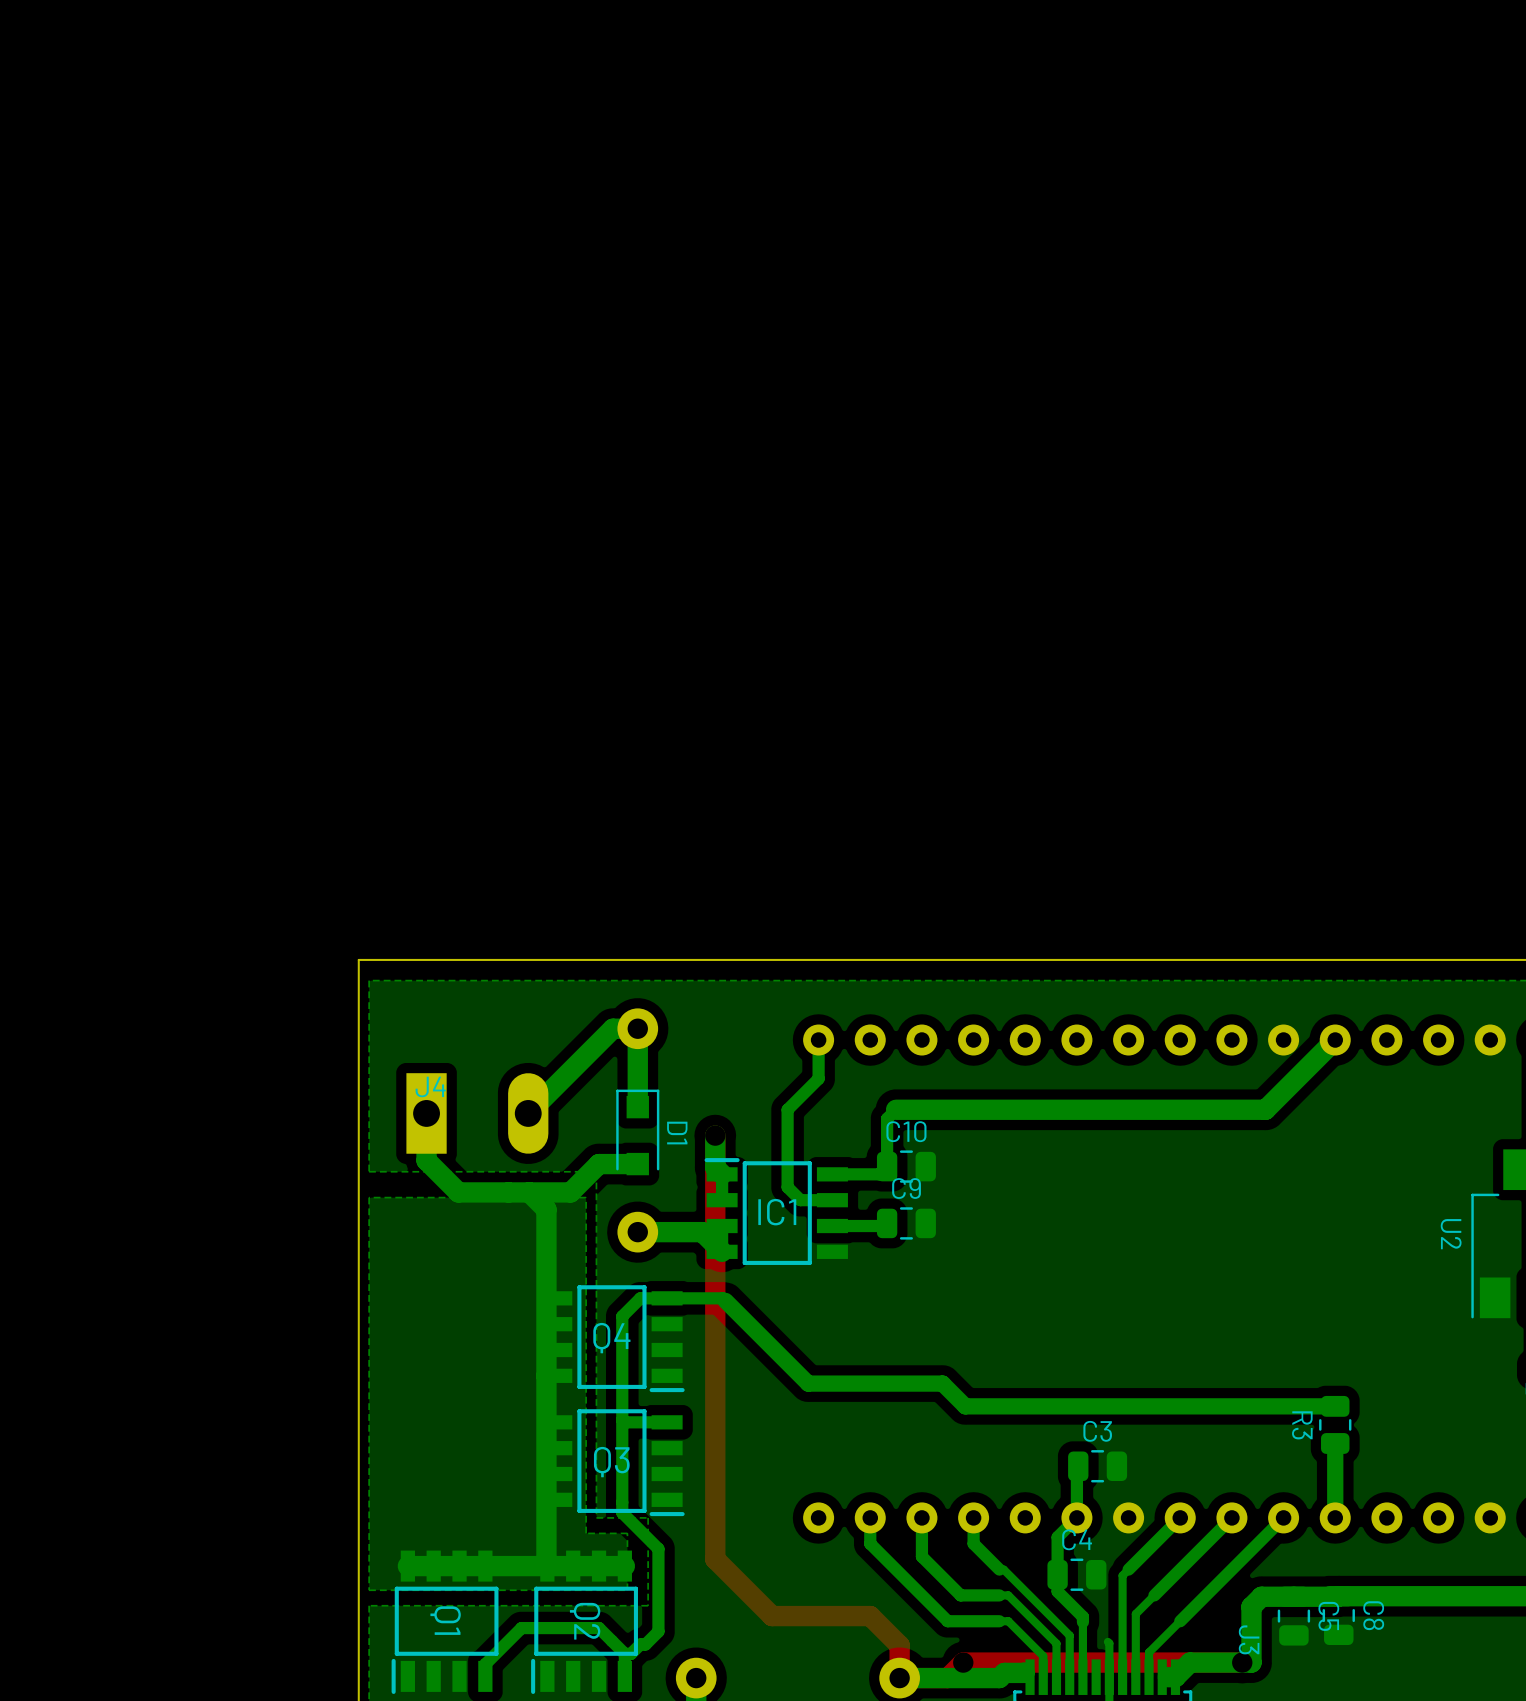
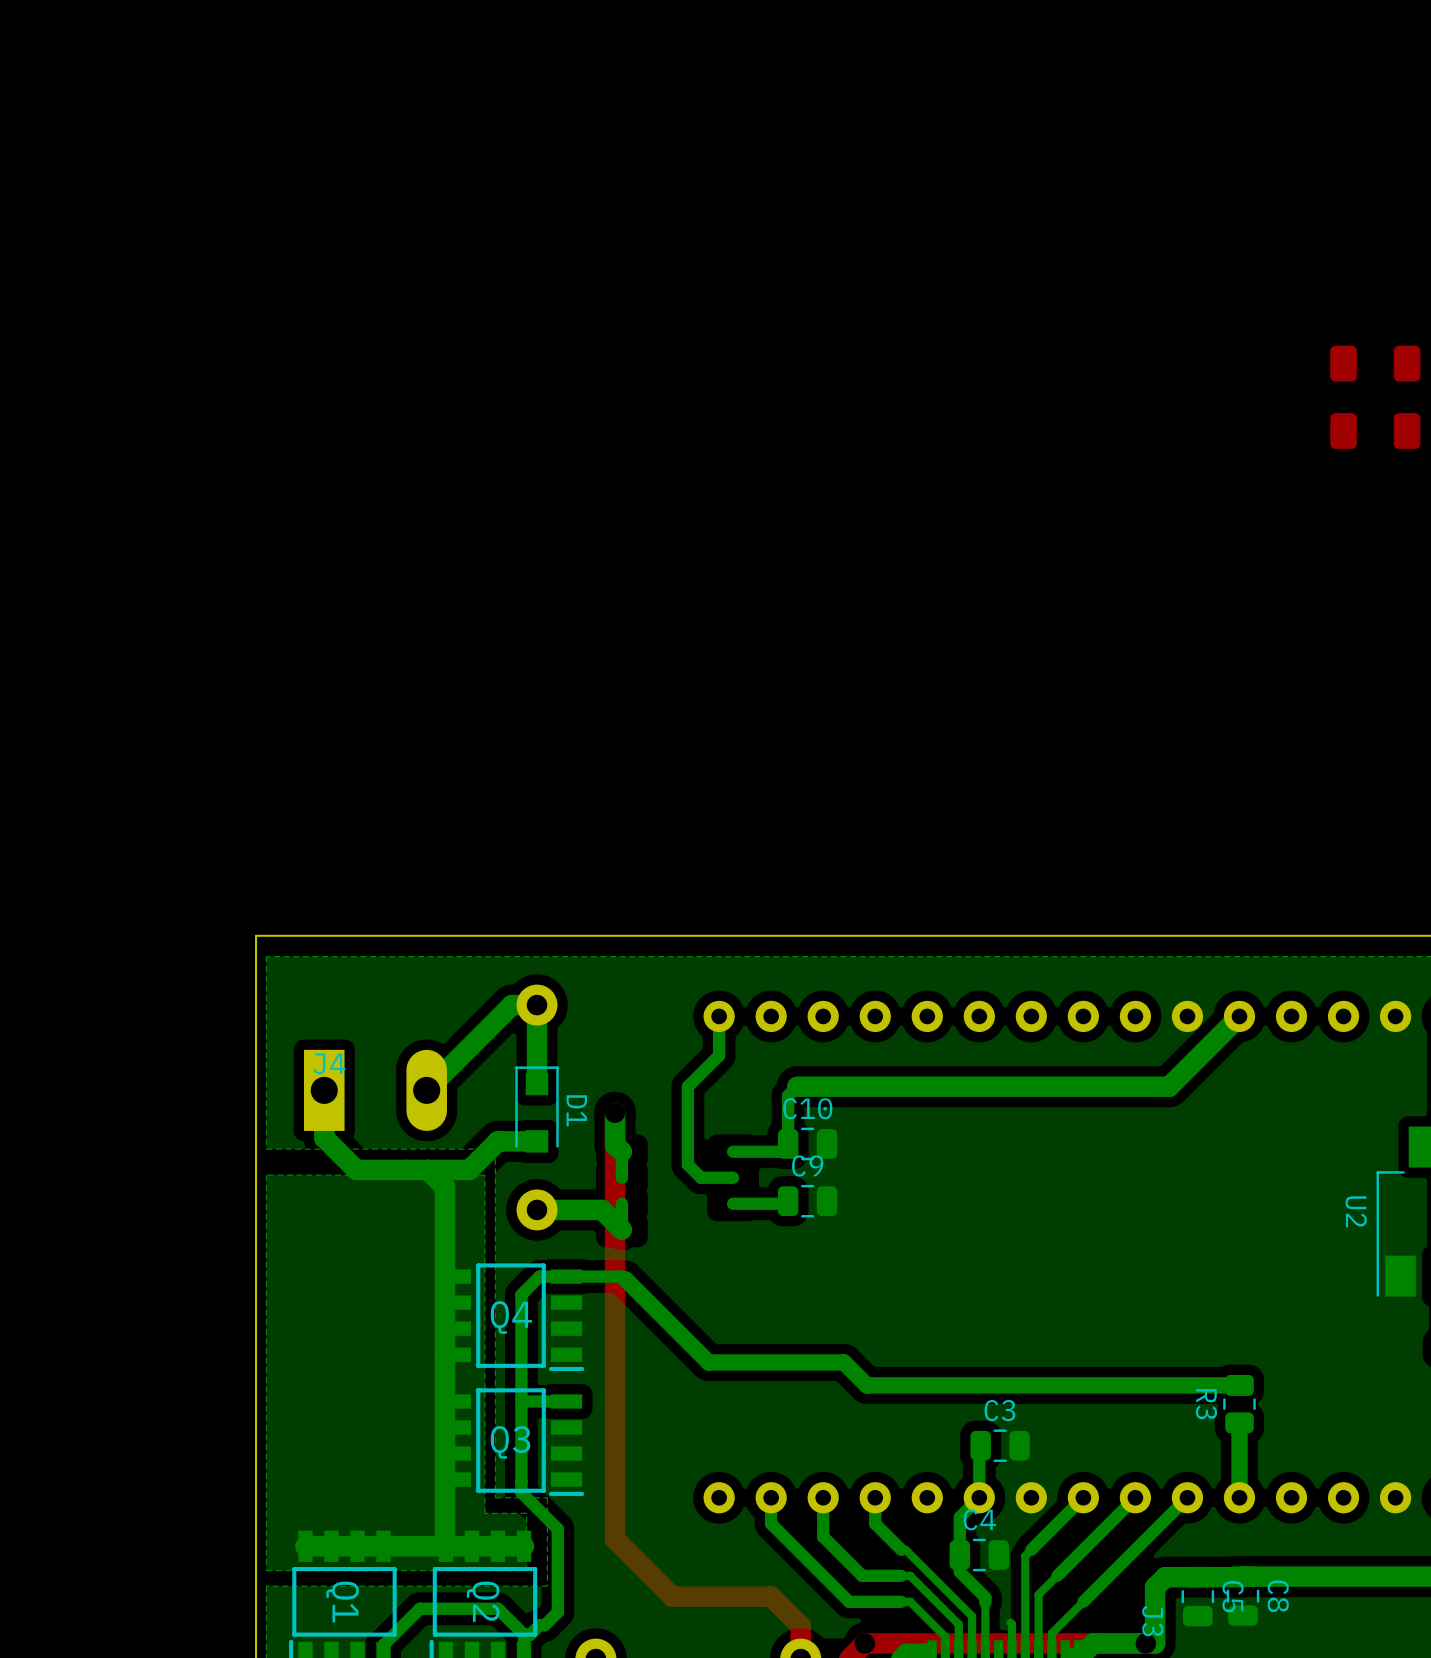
part: none -> (1375, 363)
part: none -> (1375, 431)
IC1: (776, 1211) -> none

